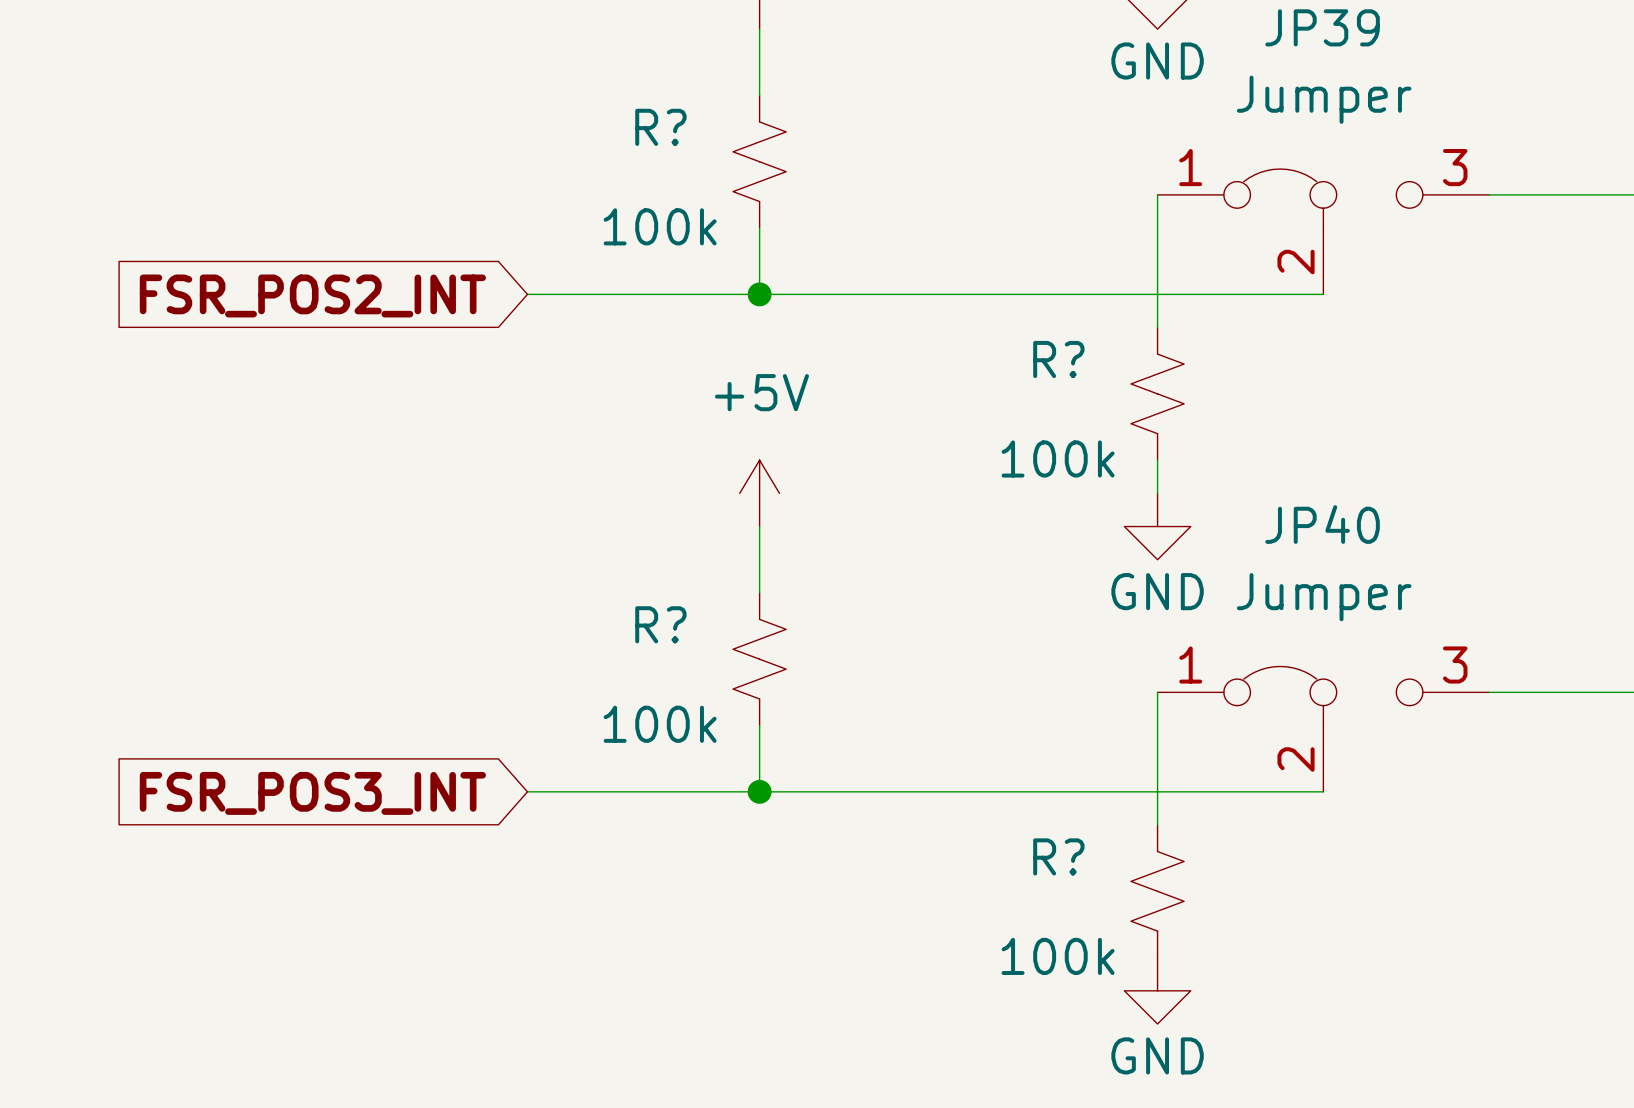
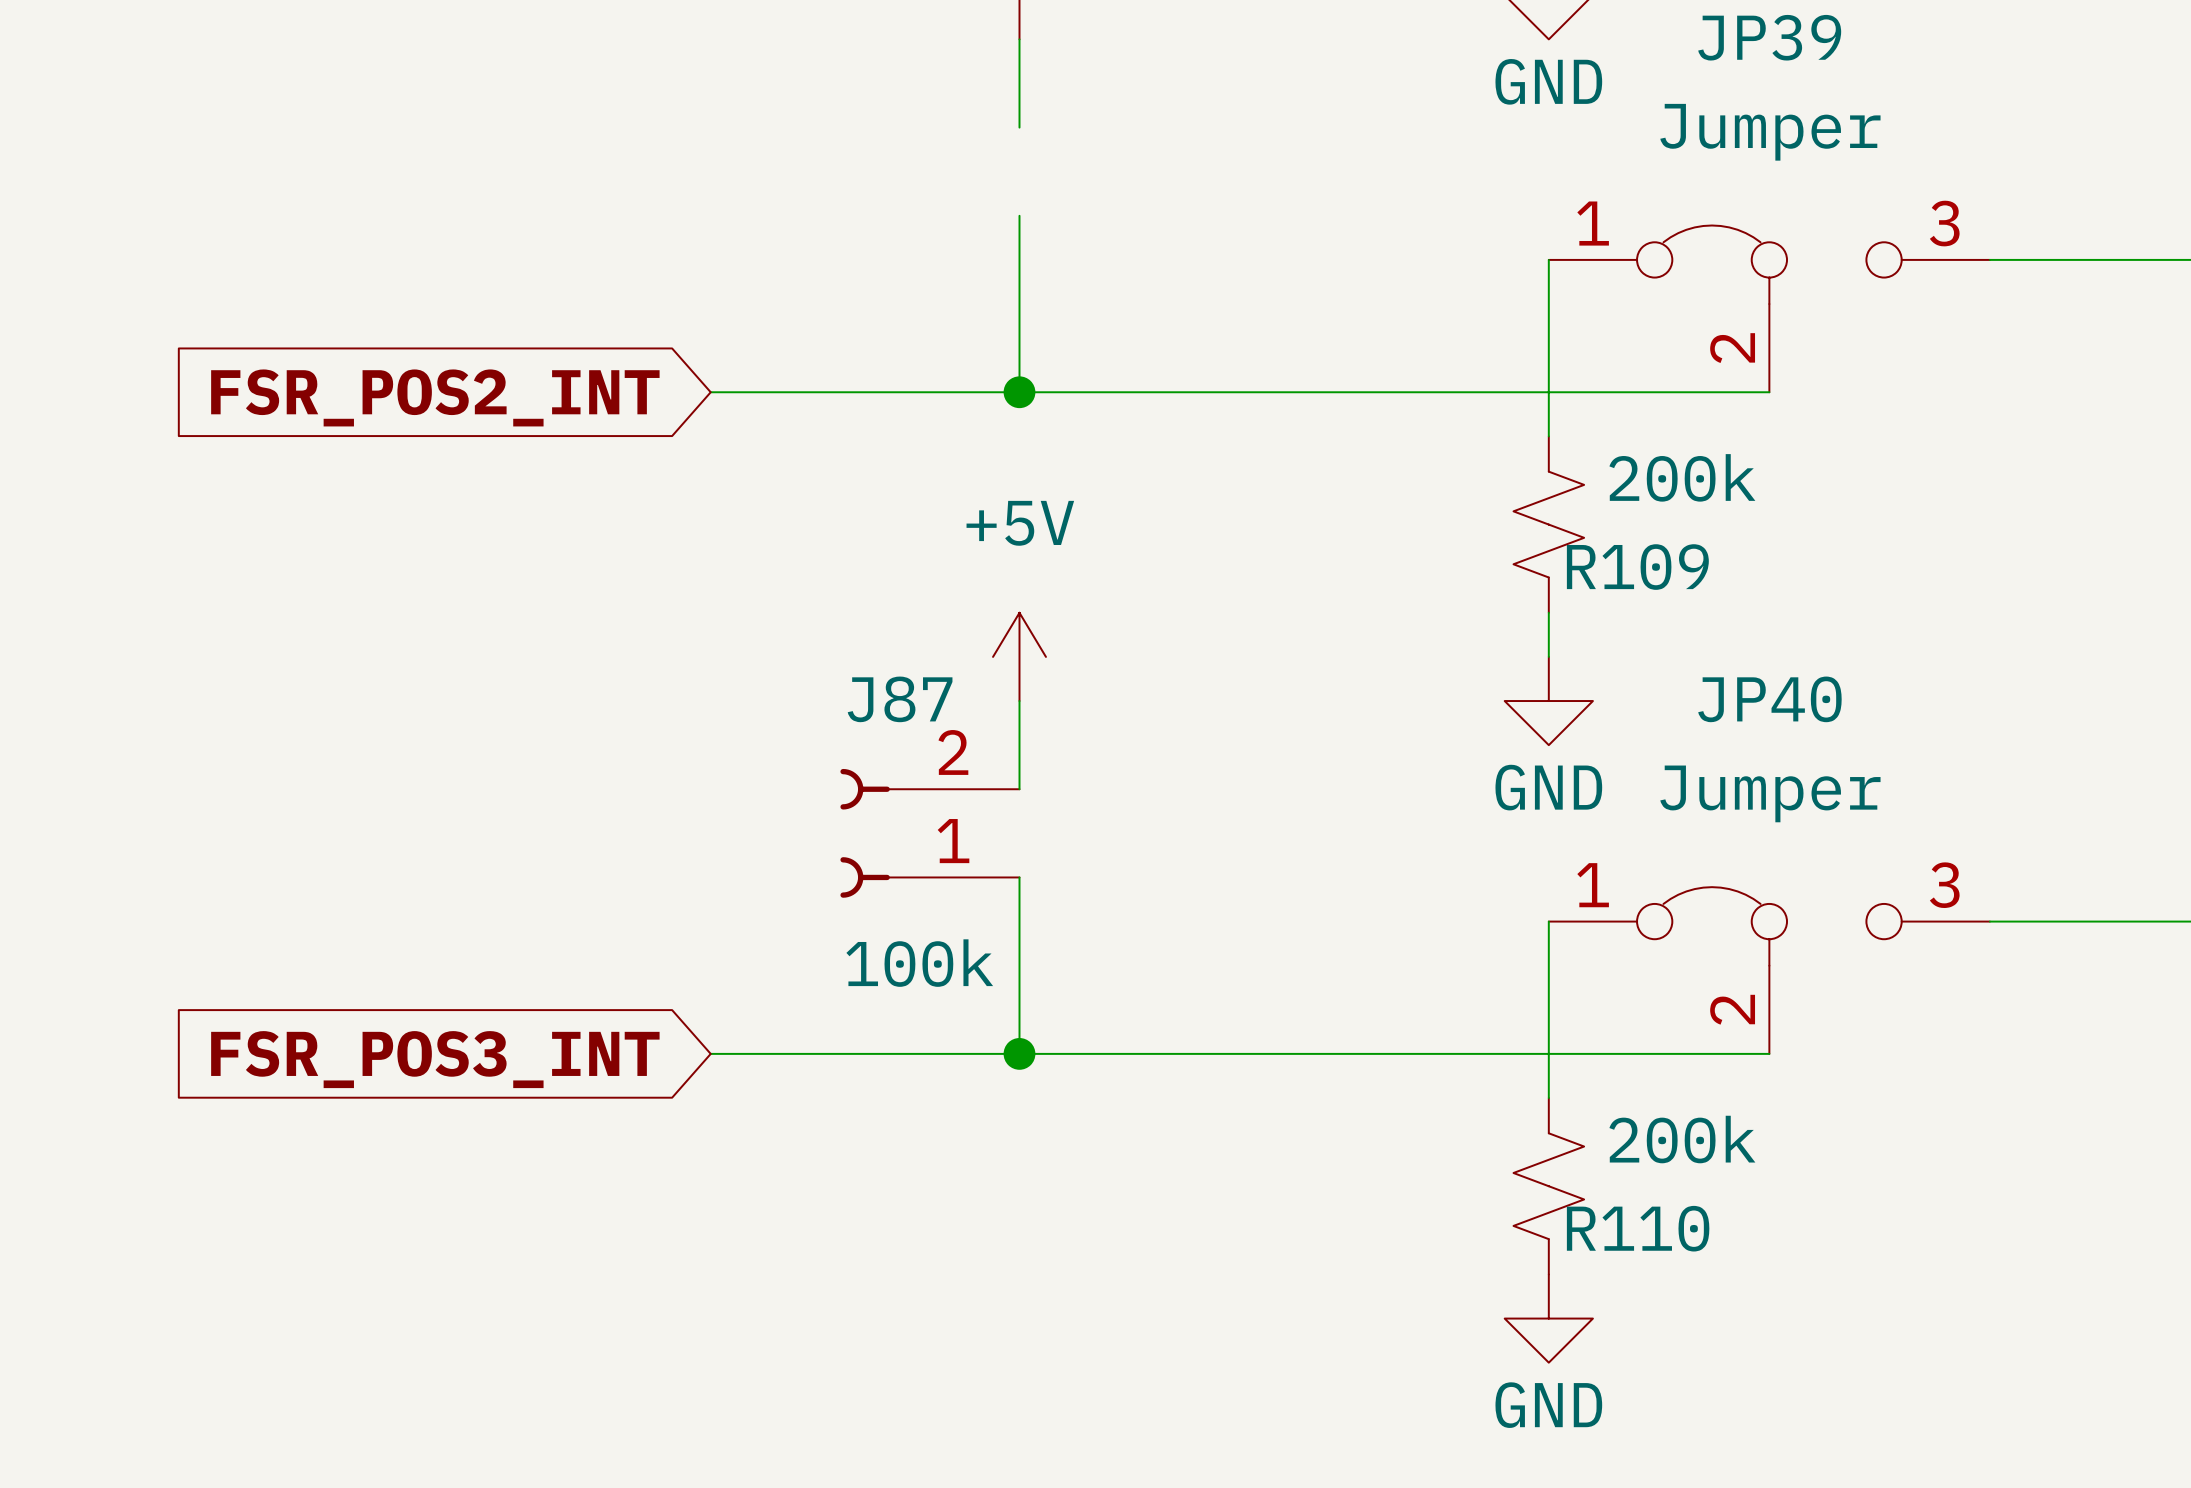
wire: none -> (1019, 215) (1019, 304)
R?: 100k (759, 161) -> none
R? name: R? (1058, 359) -> R109 (1637, 567)
R? value: 100k (1058, 458) -> 200k (1682, 477)
J87: none -> 100k (929, 833)
wire: none -> (1019, 877) (1019, 965)
R?: 100k (759, 659) -> none
R? name: R? (1058, 856) -> R110 (1638, 1228)
R? value: 100k (1058, 956) -> 200k (1682, 1139)

